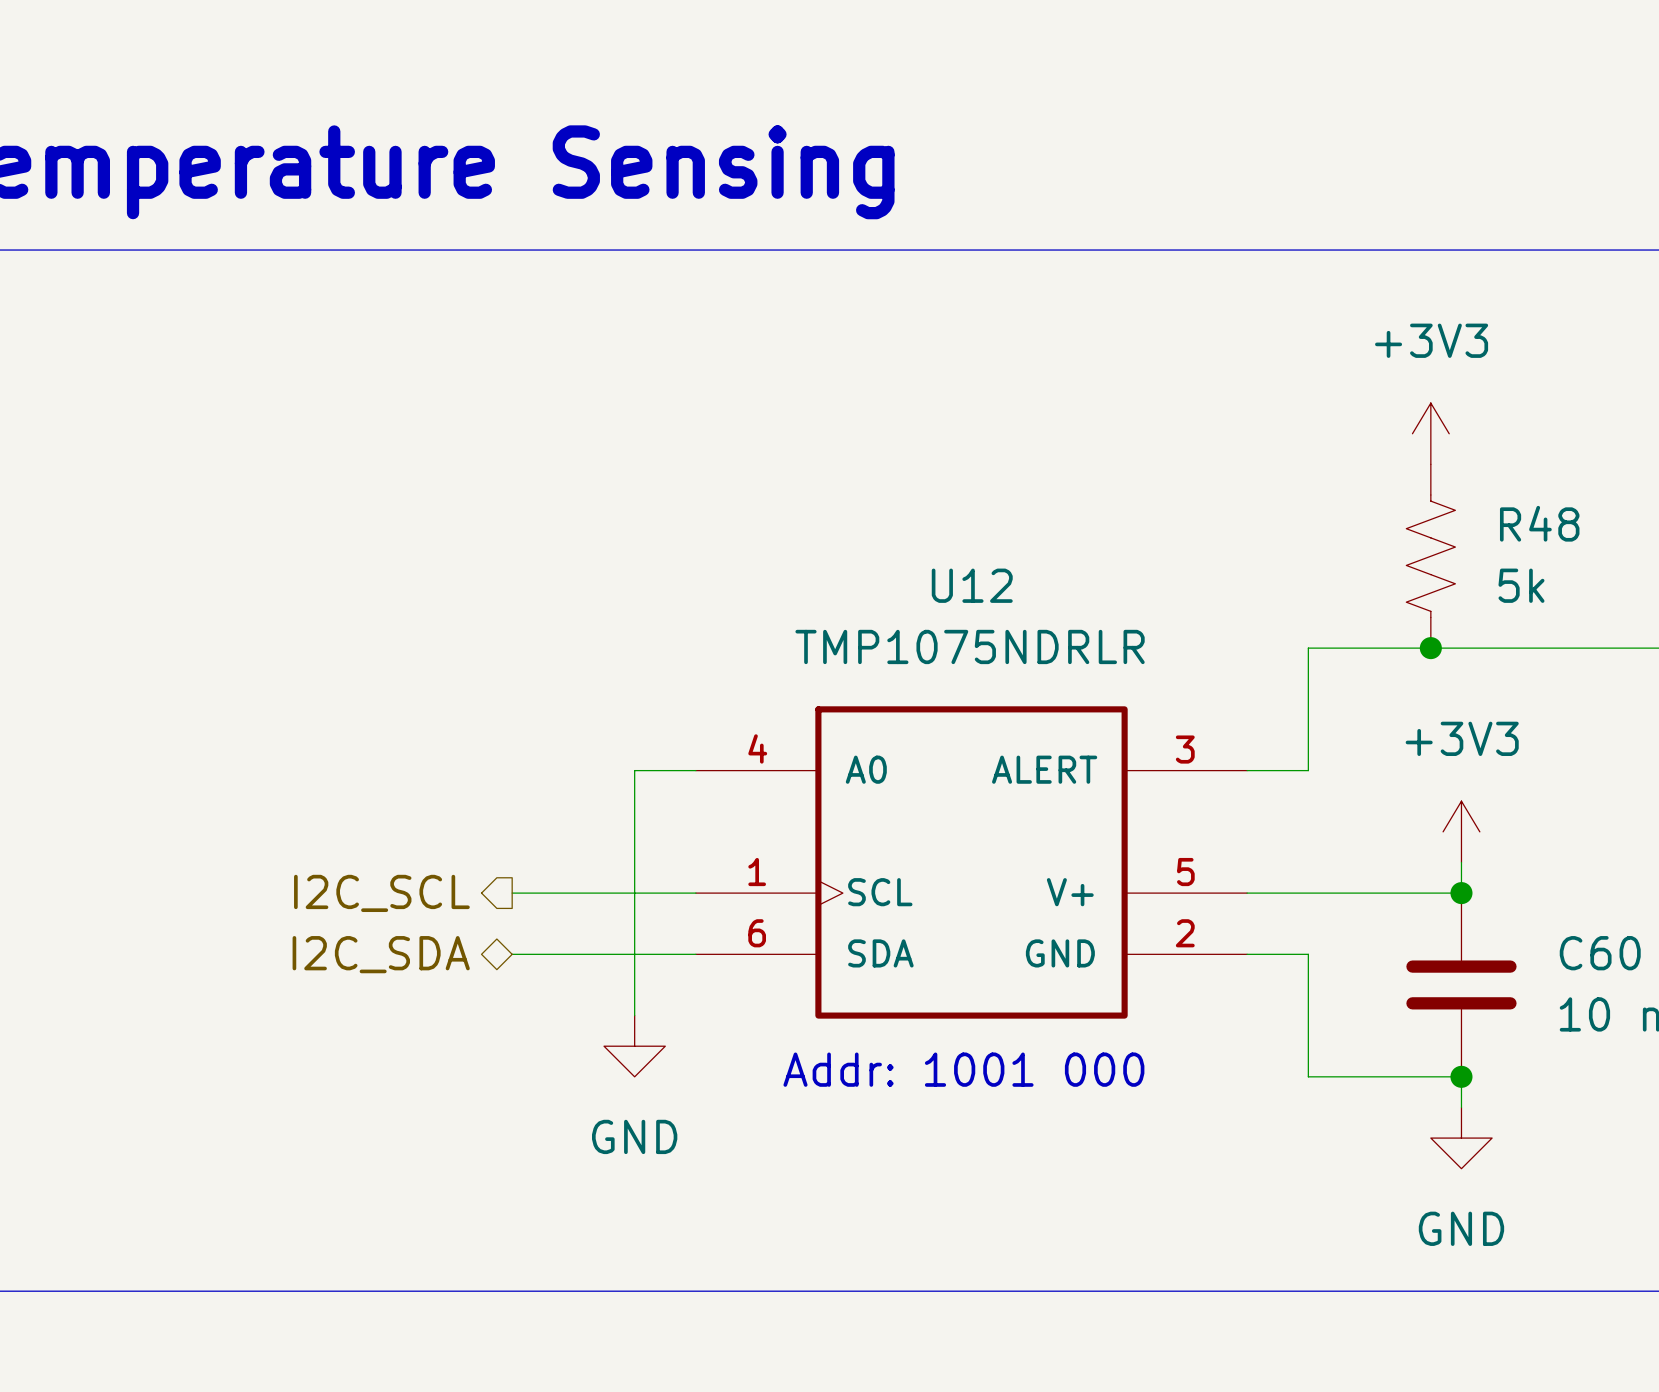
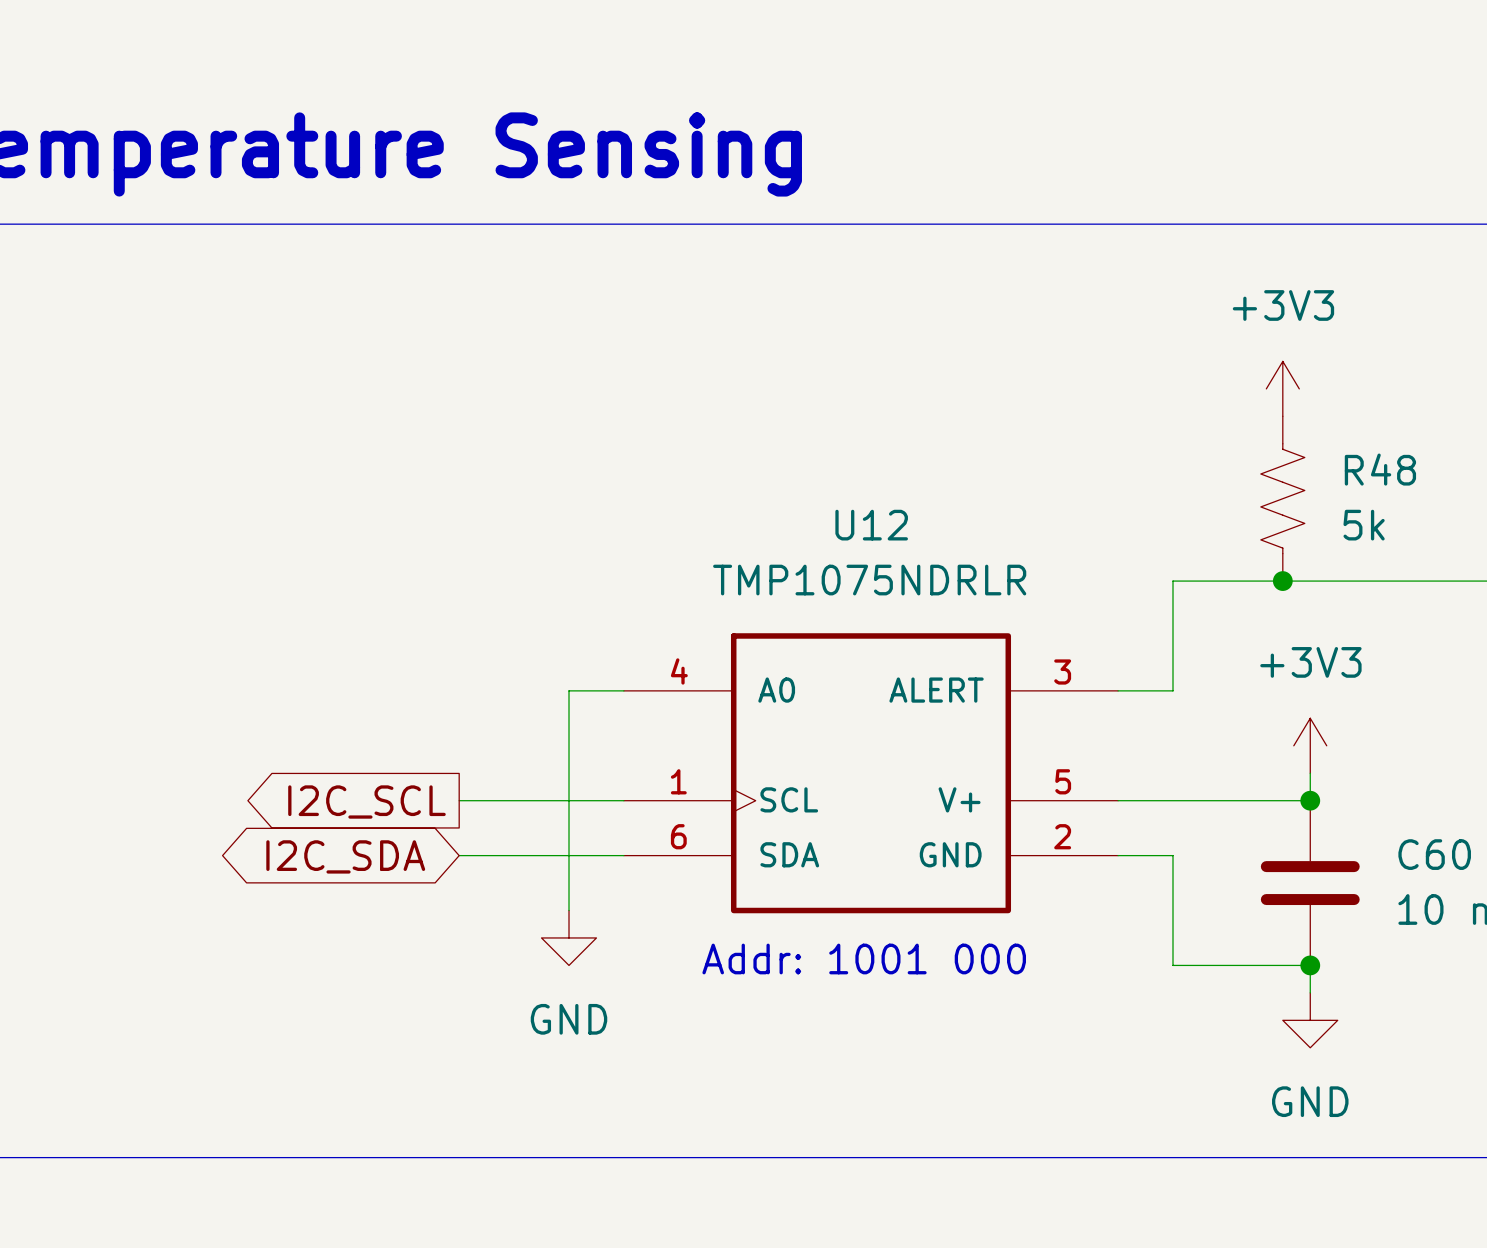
hierarchical label: I2C_SCL (381, 893) -> none
global label: none -> I2C_SCL (366, 802)
hierarchical label: I2C_SDA (381, 954) -> none
global label: none -> I2C_SDA (345, 856)

